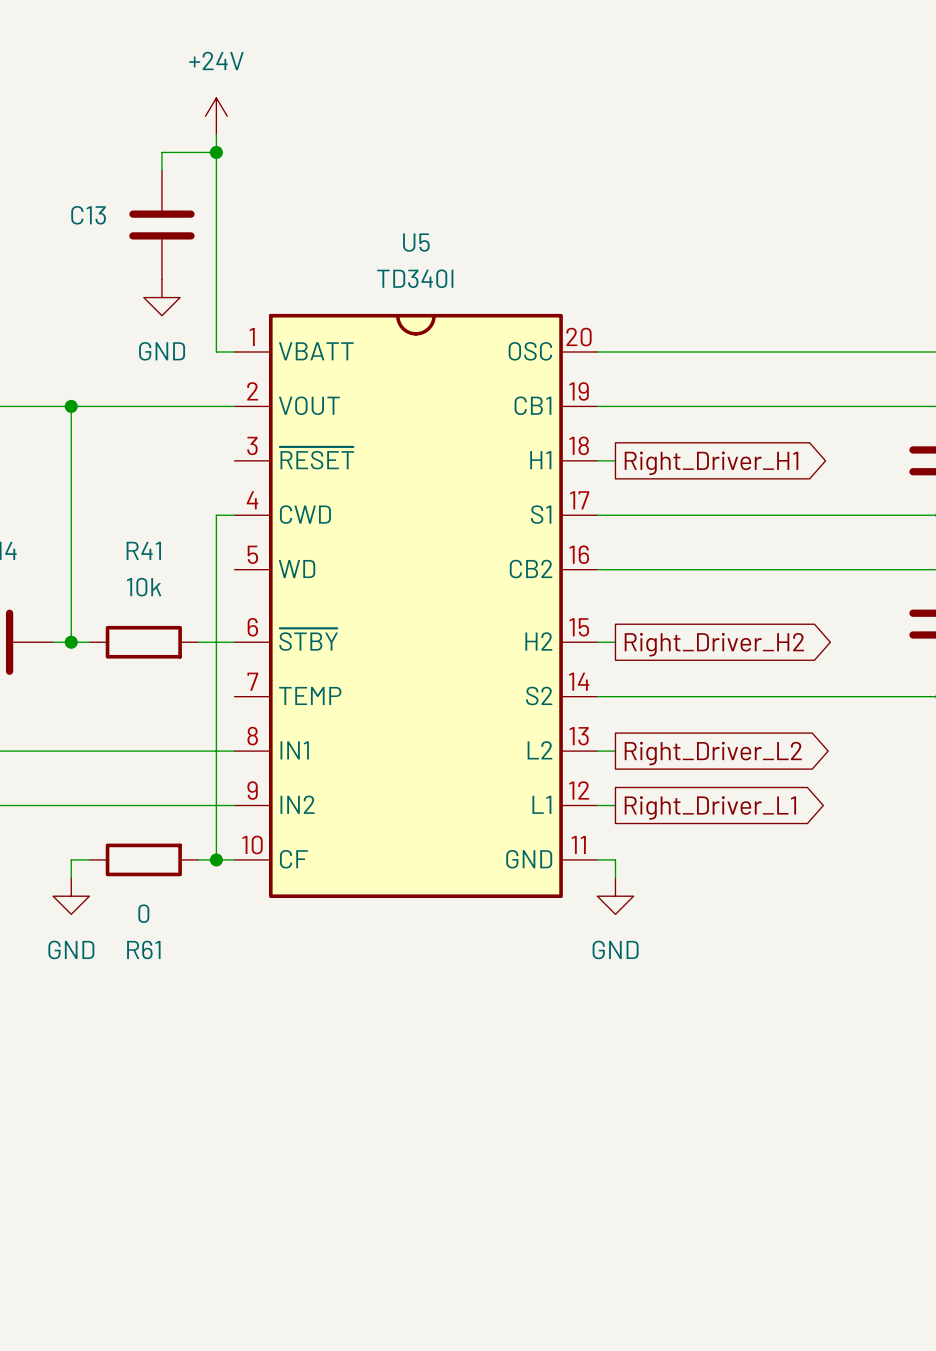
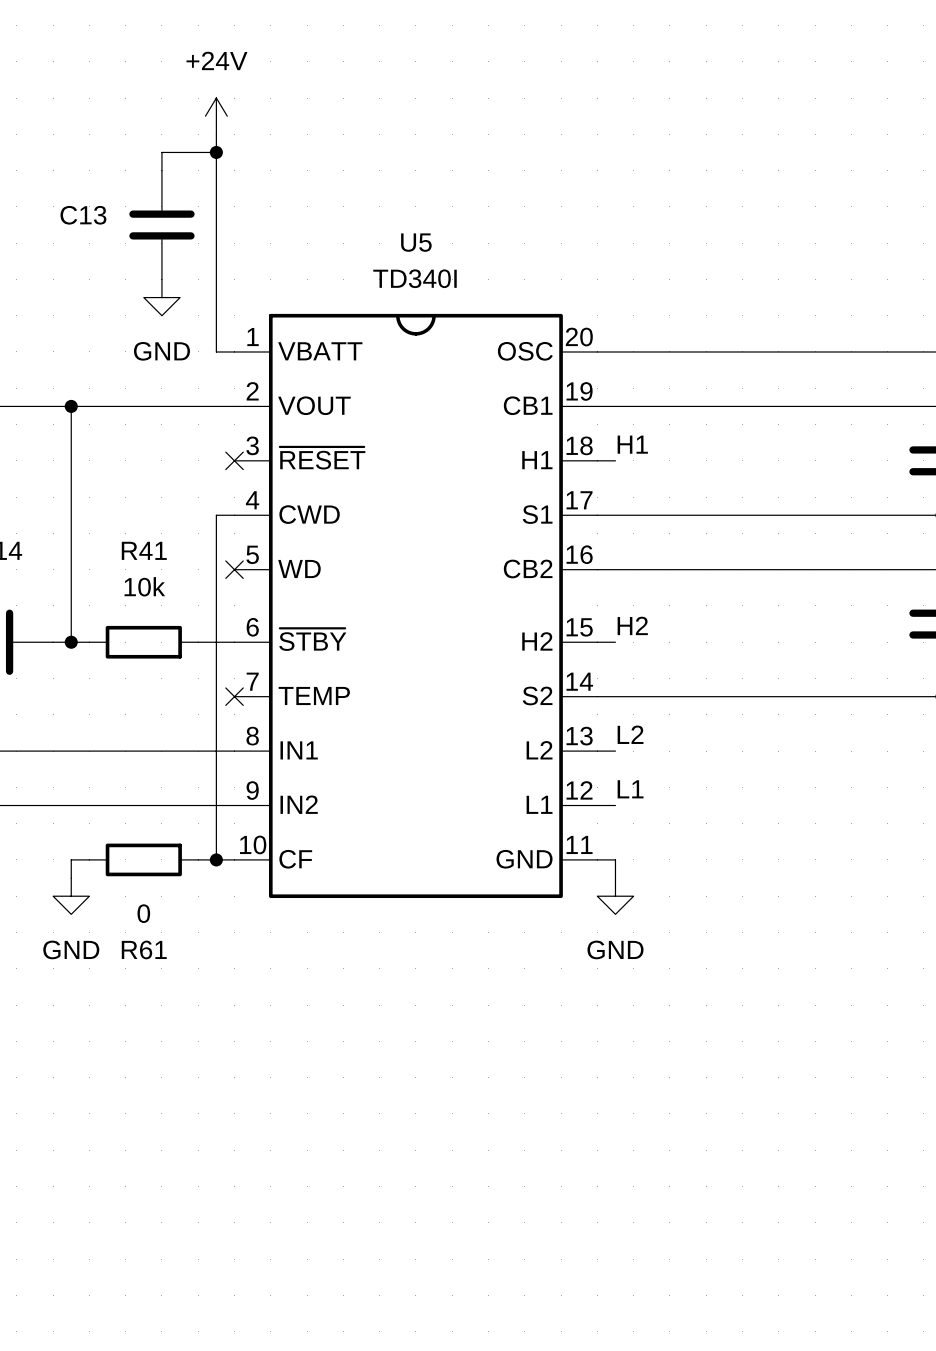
label: none -> H1 (632, 444)
no-connect mark: none -> (234, 460)
global label: Right_Driver_H1 (711, 463) -> none
no-connect mark: none -> (234, 569)
label: none -> H2 (632, 625)
global label: Right_Driver_H2 (714, 644) -> none
no-connect mark: none -> (234, 696)
label: none -> L2 (630, 734)
global label: Right_Driver_L2 (713, 753) -> none
label: none -> L1 (630, 789)
global label: Right_Driver_L1 (710, 807) -> none

